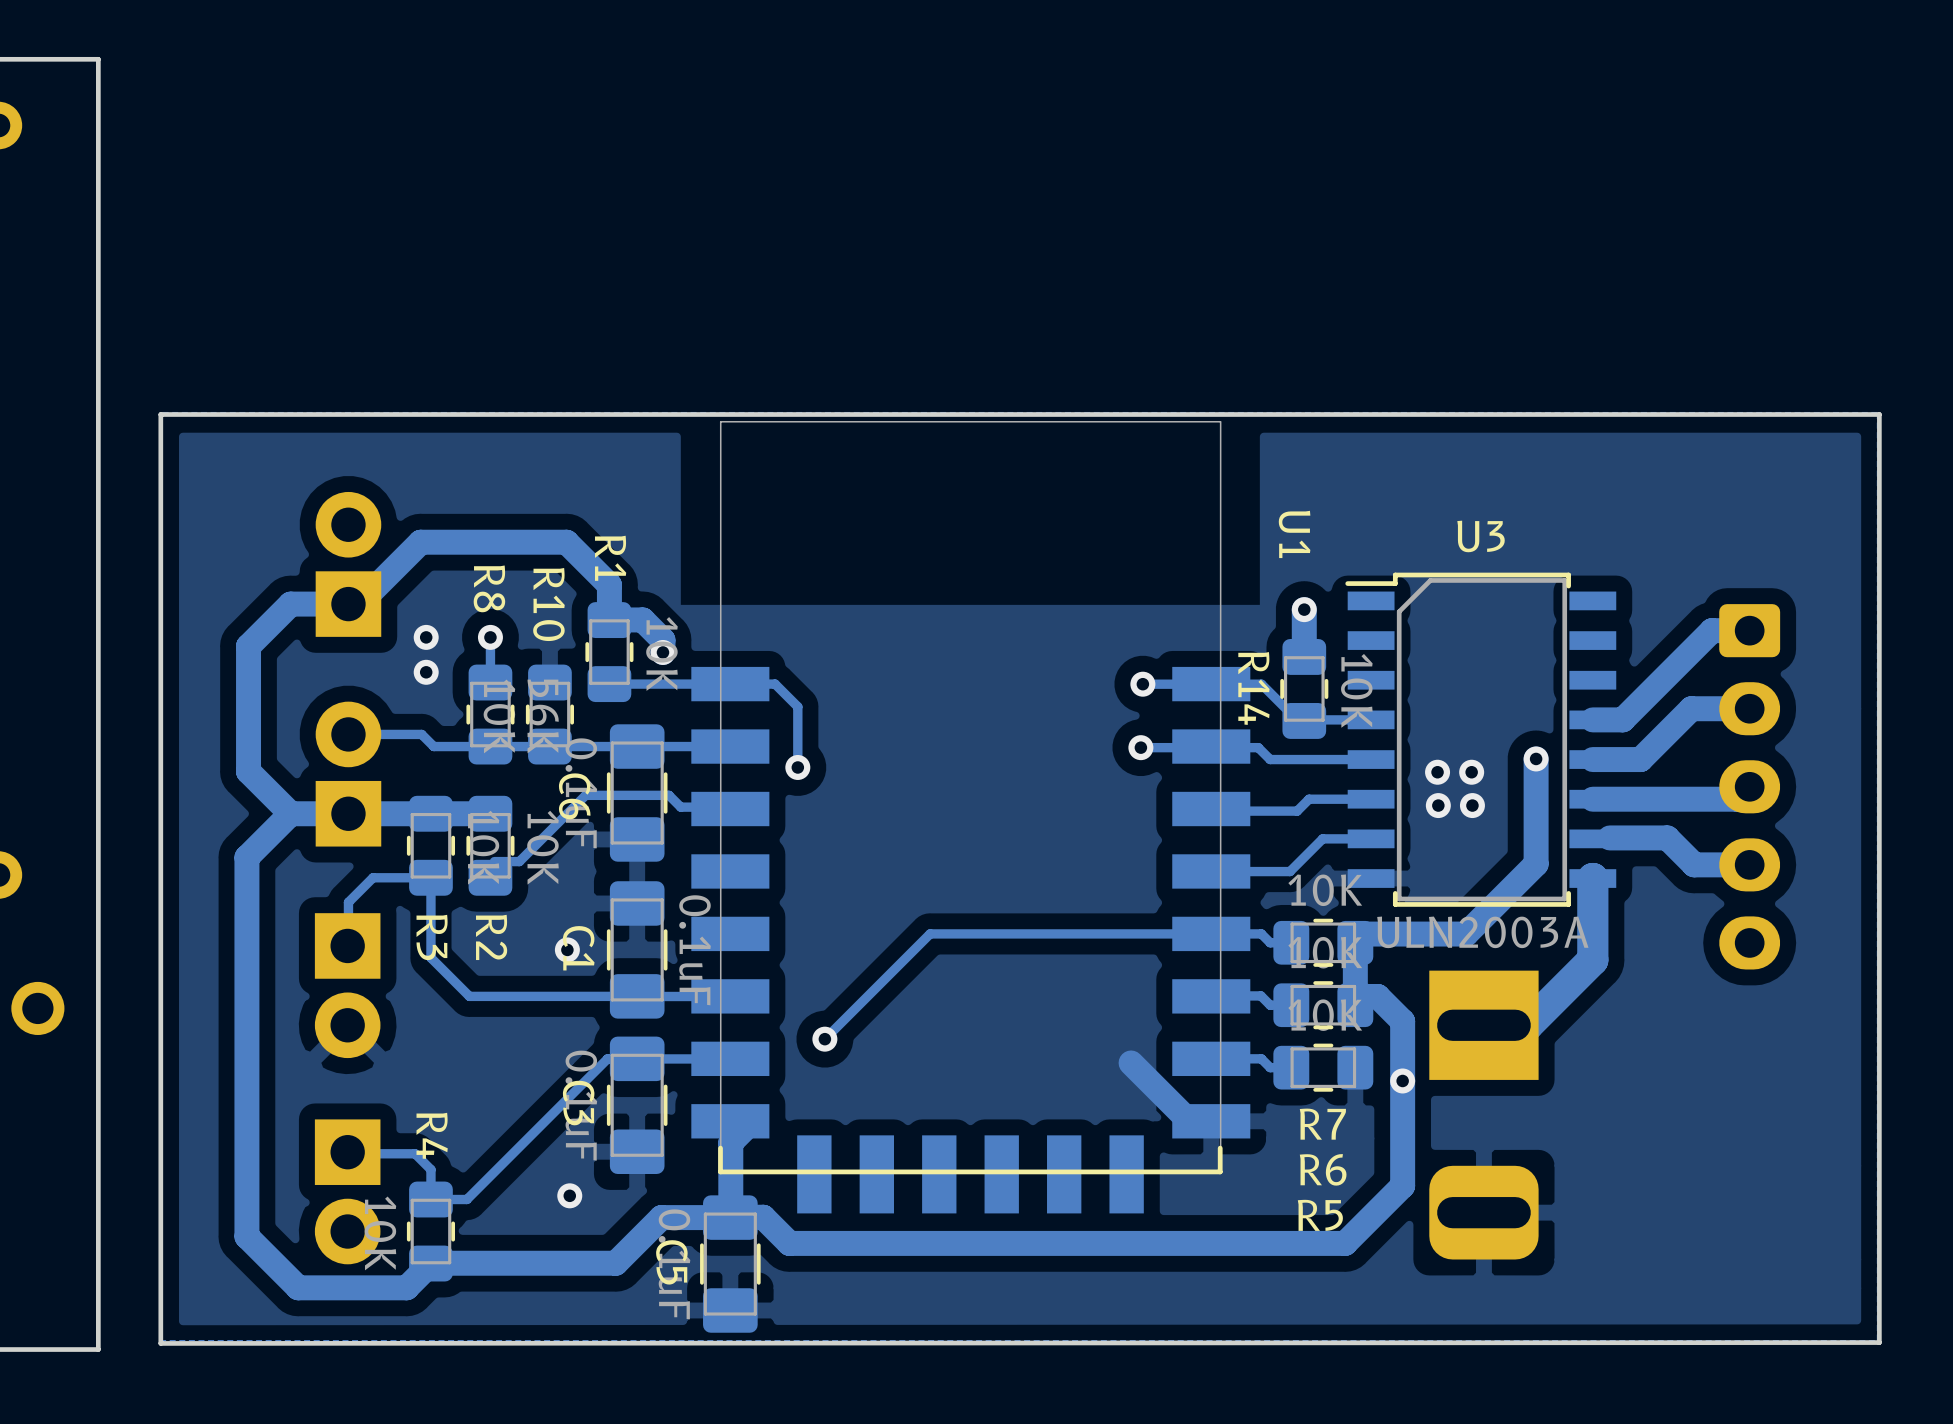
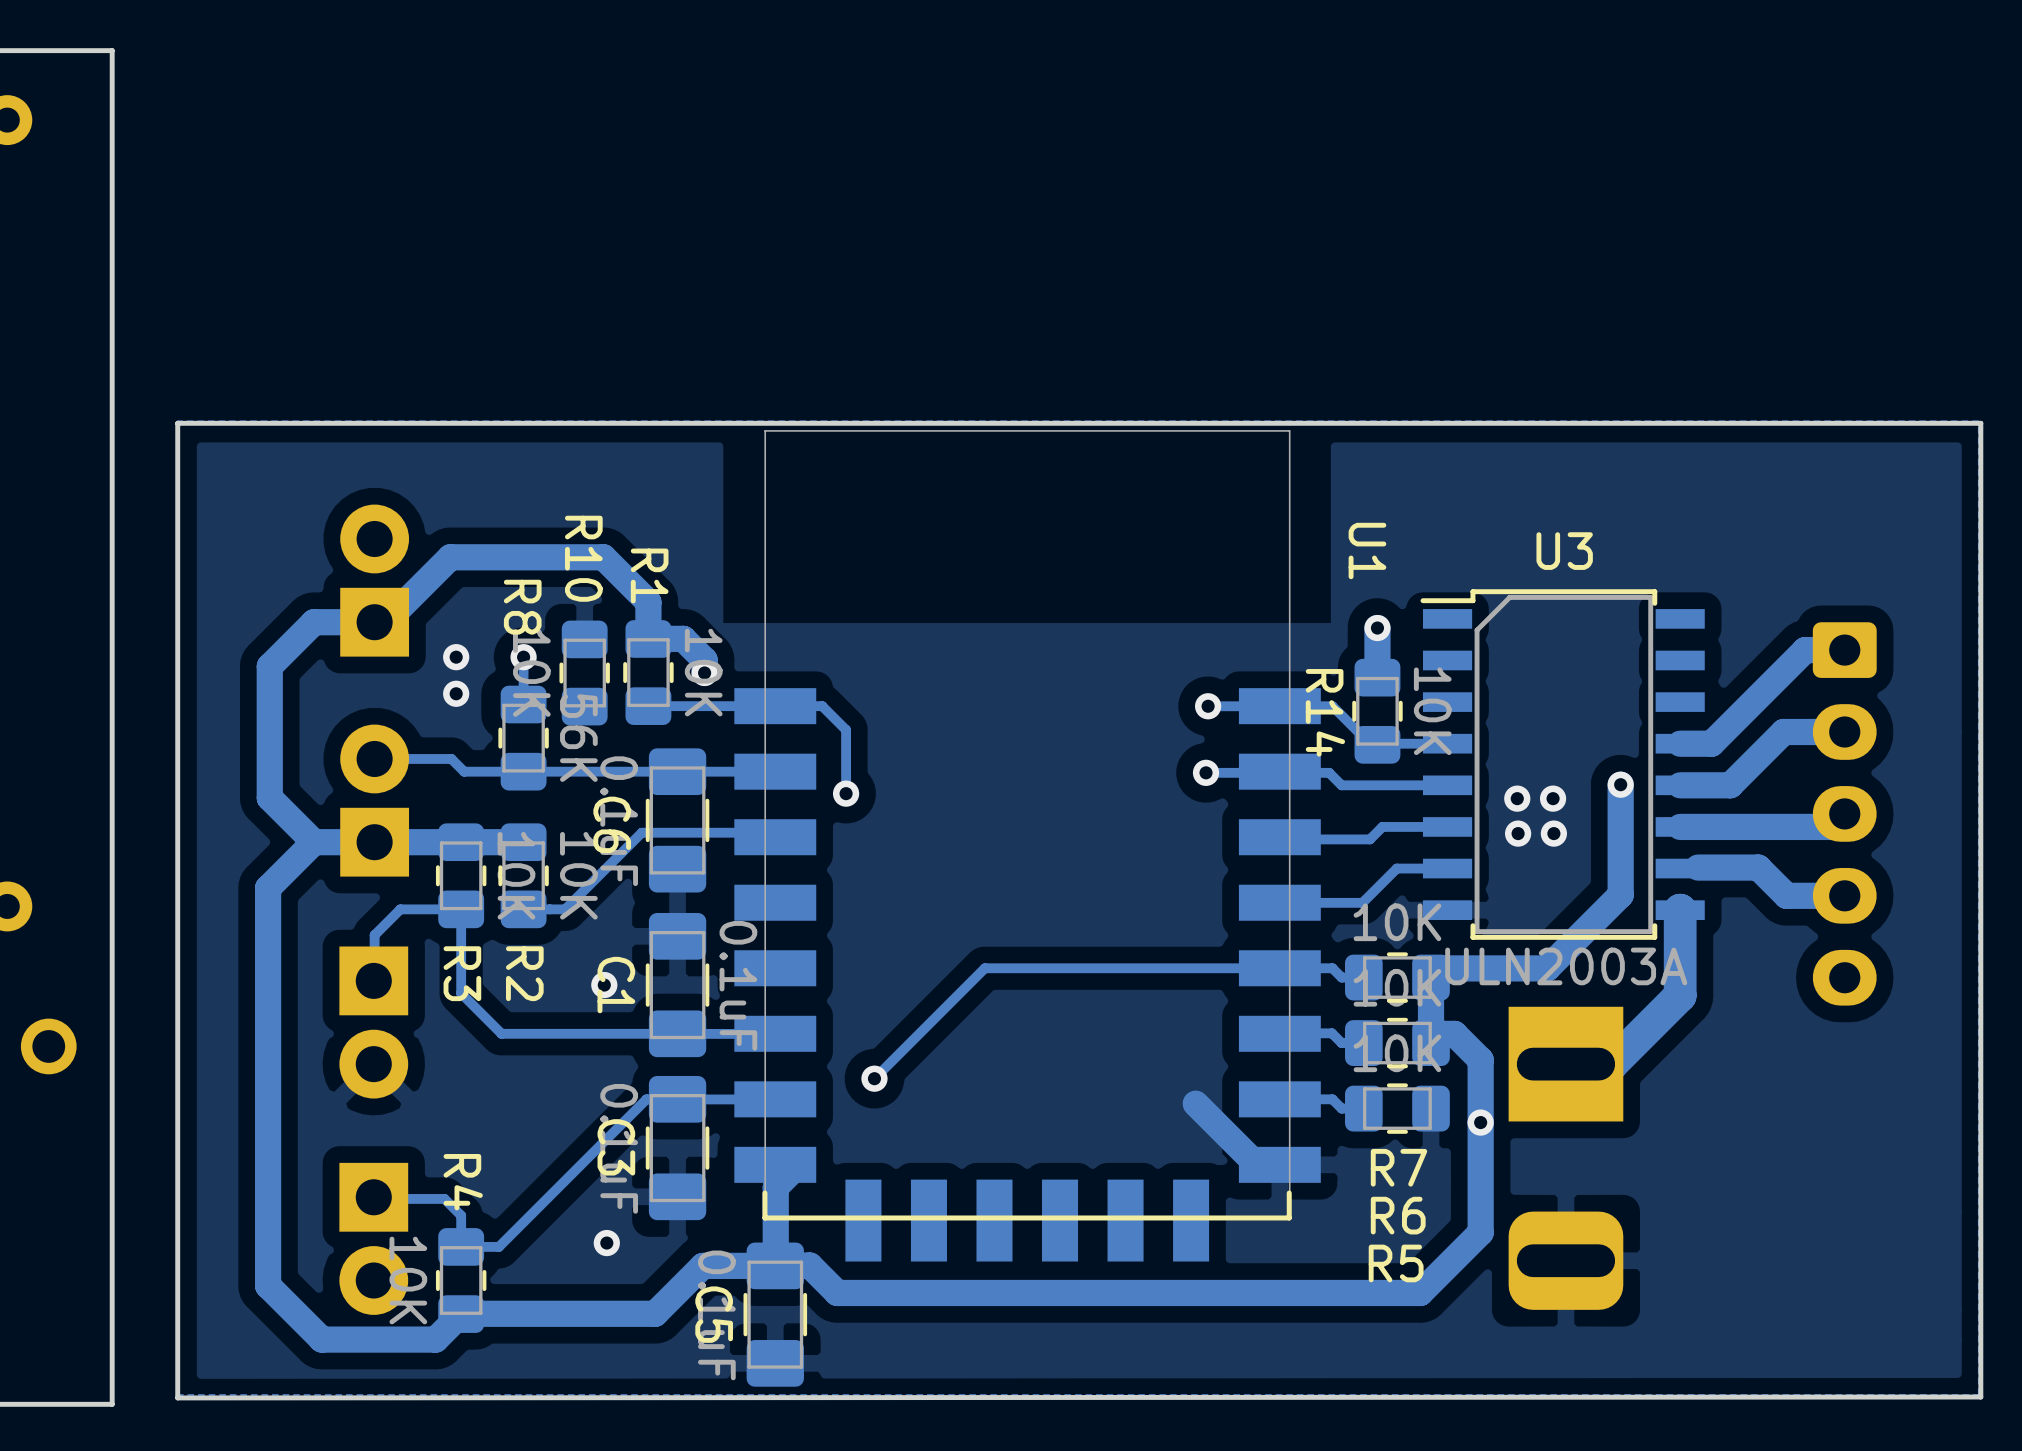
R10 position: (549, 714) -> (584, 673)
track: (750, 807) (680, 807) (669, 795) (585, 795) (519, 861) (494, 861) -> (796, 835) (793, 832) (641, 832) (565, 909) (523, 909)

